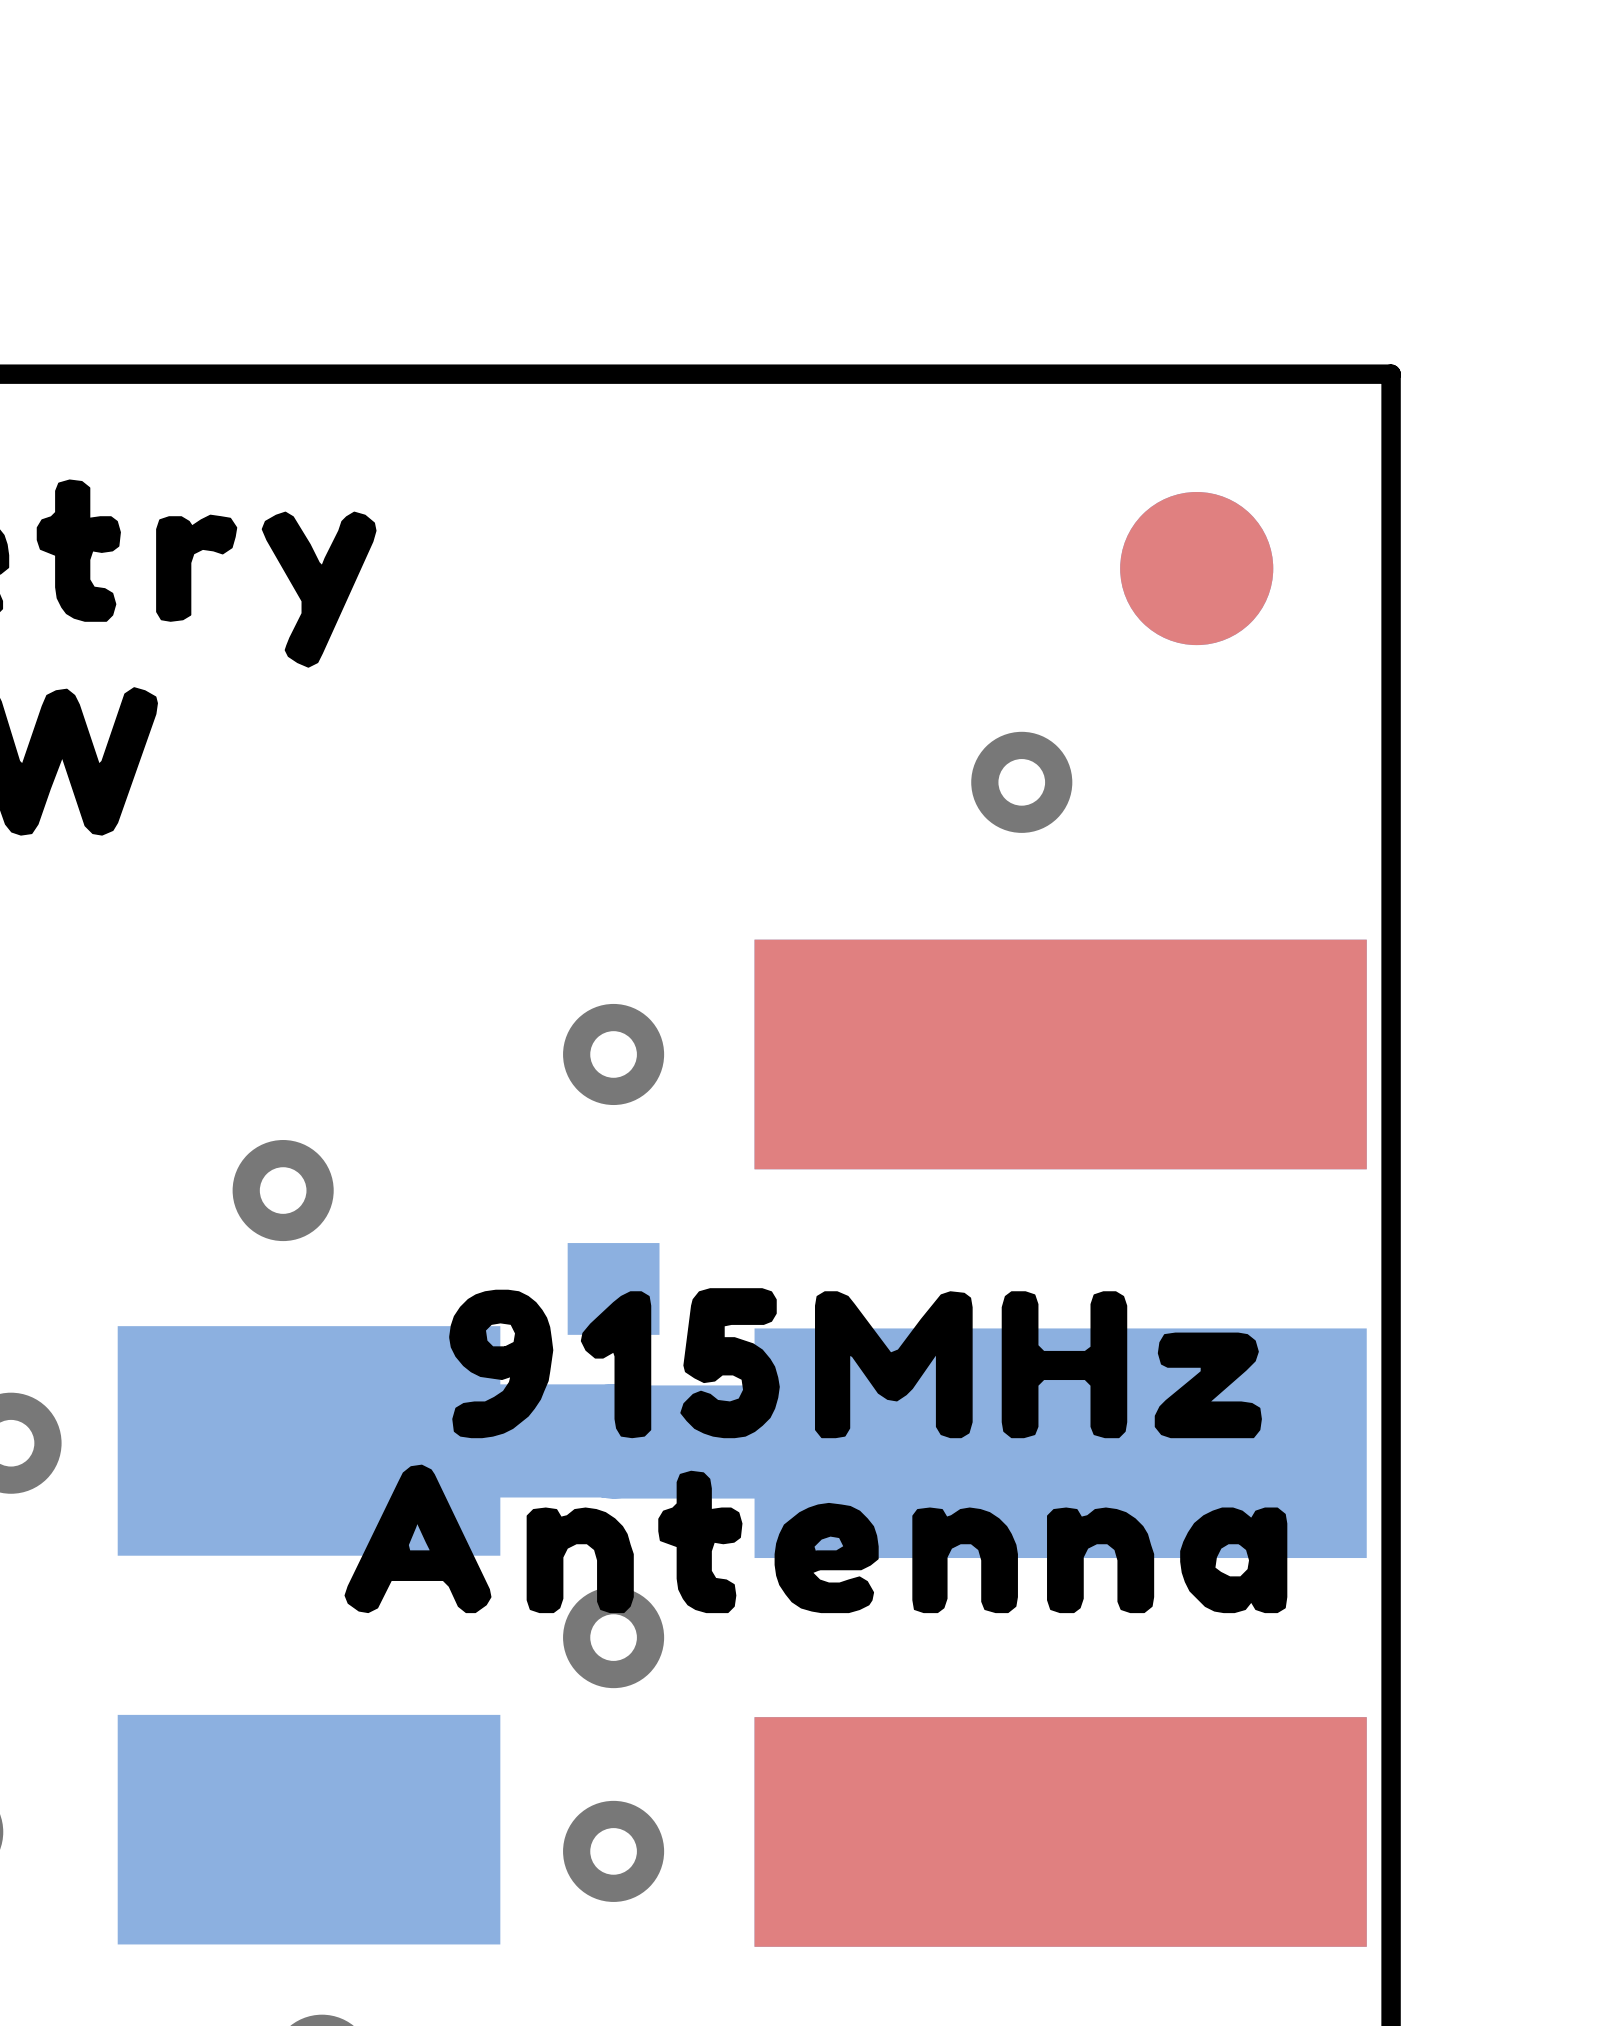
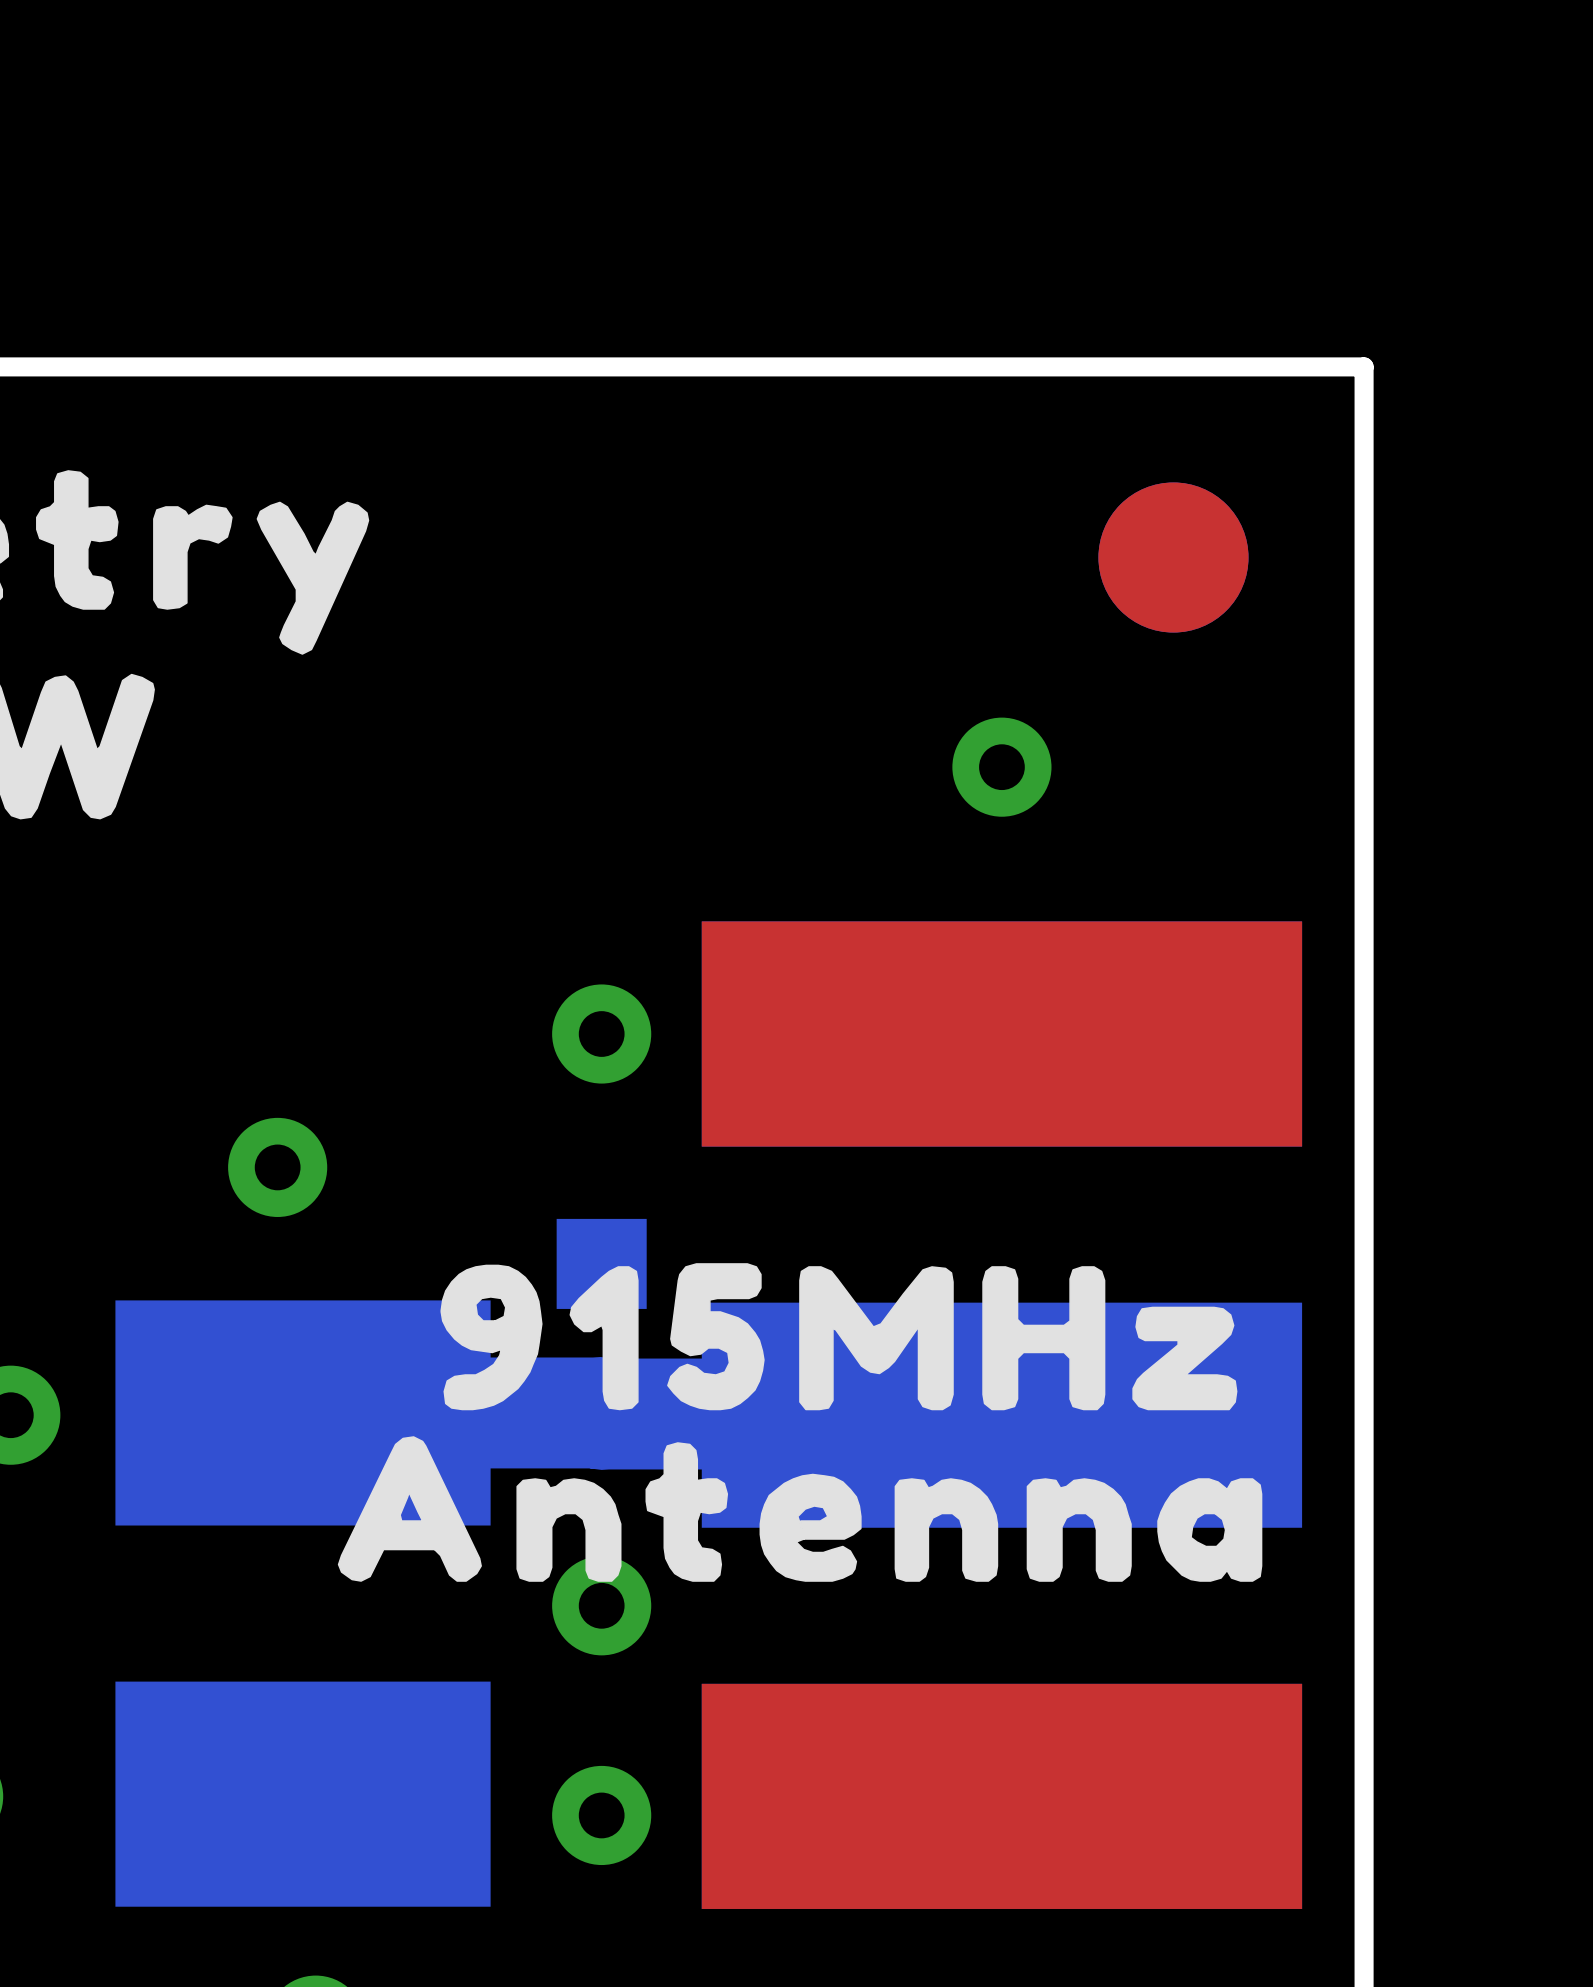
part position: (1060, 1443) -> (1001, 1415)

